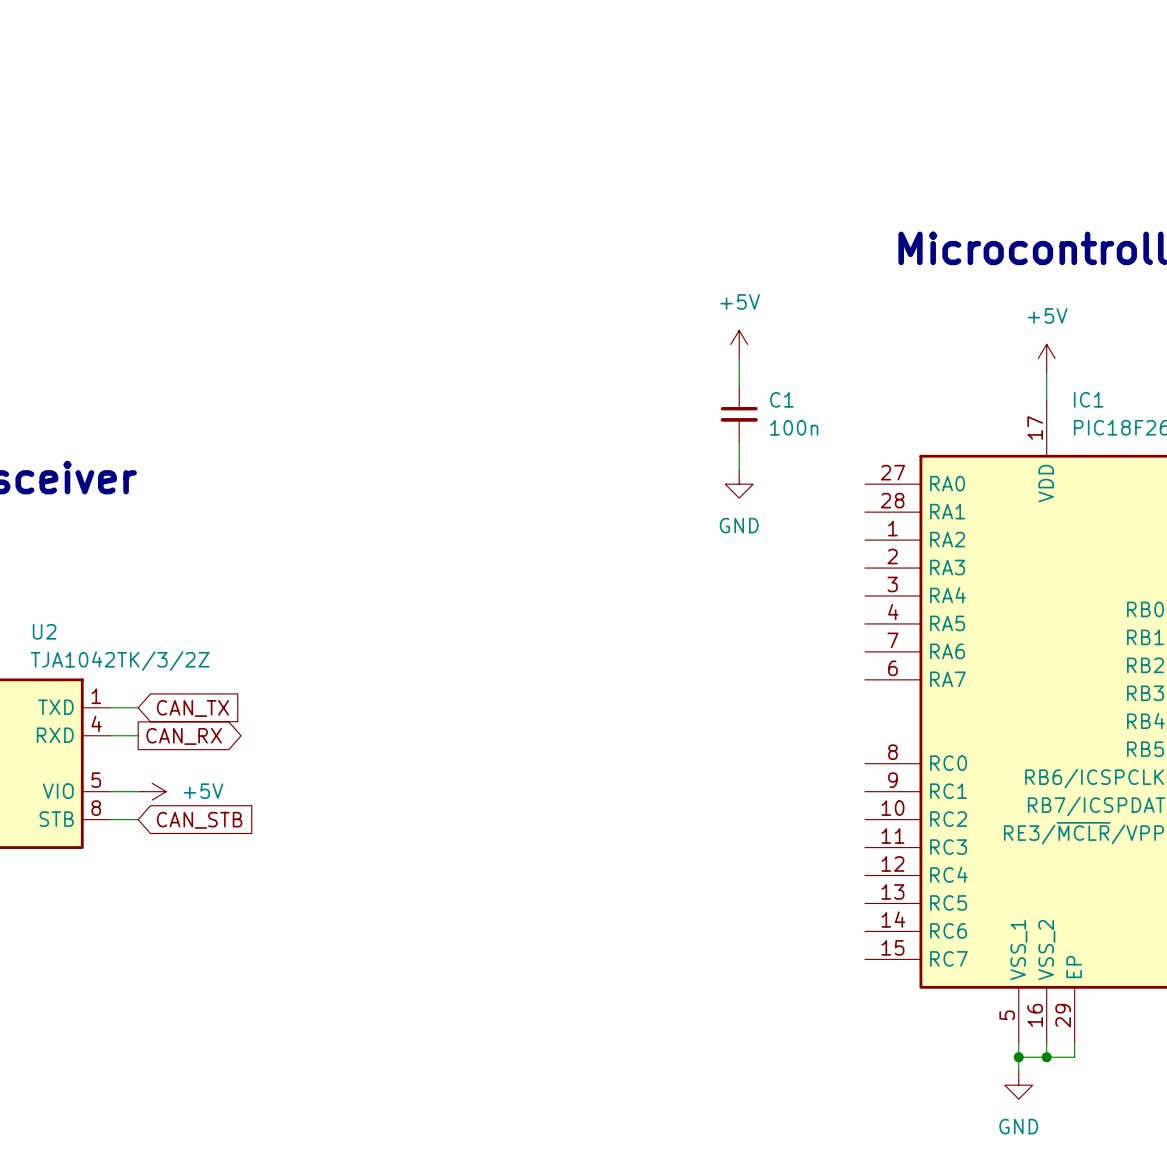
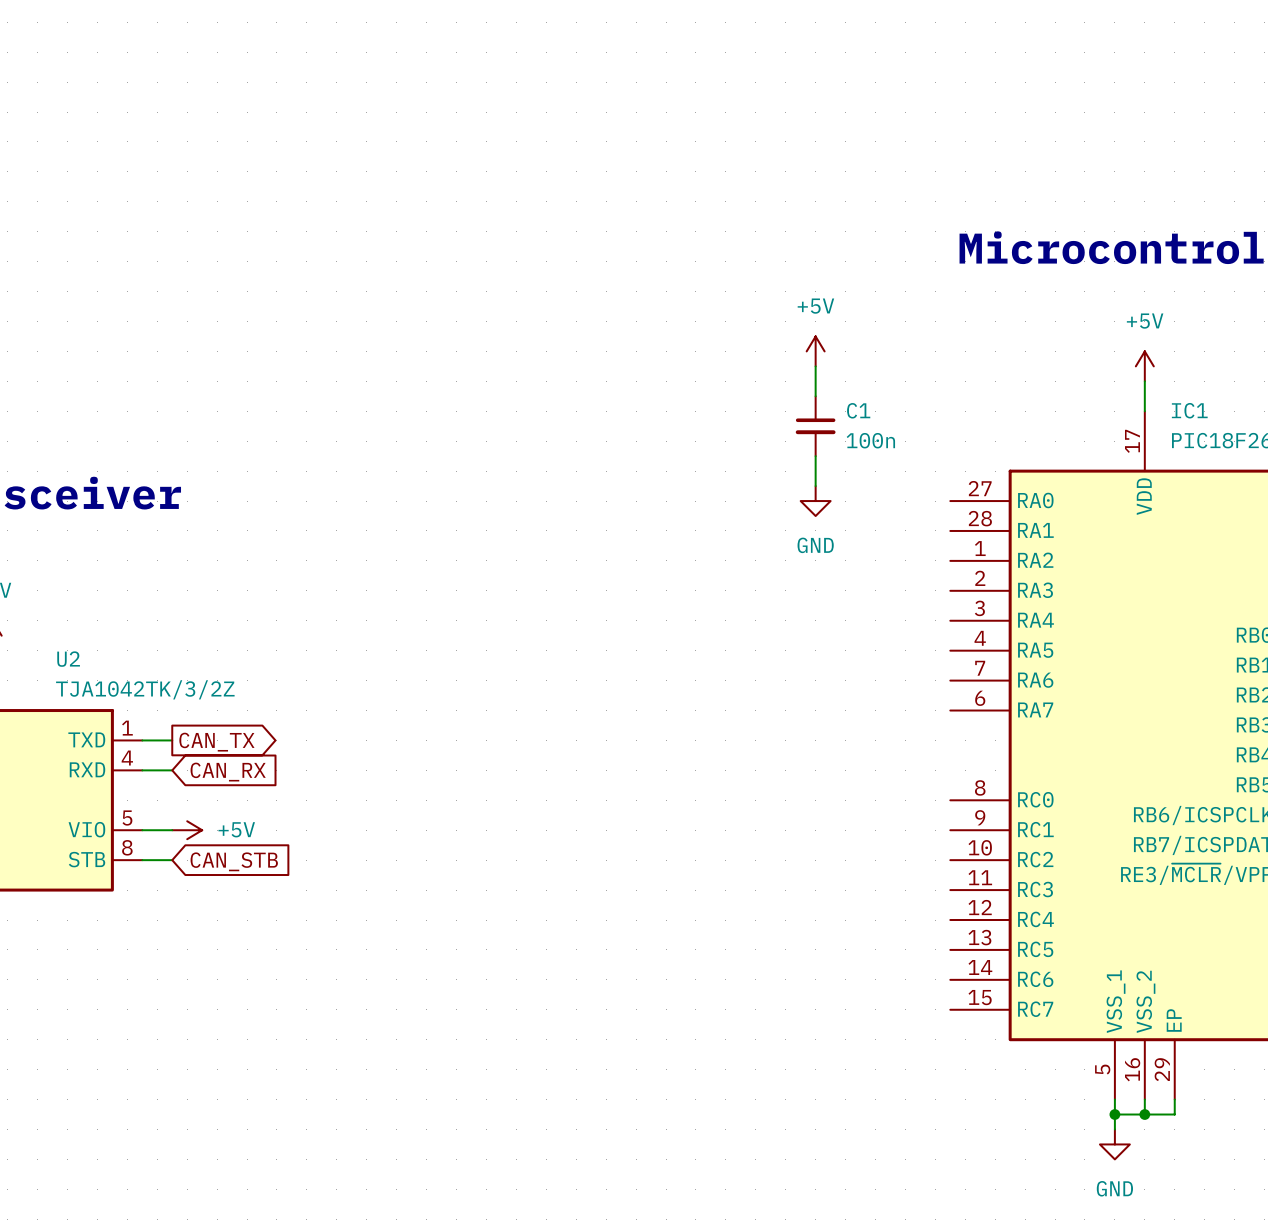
global label shape: input (192, 708) -> output (216, 742)
global label shape: output (184, 736) -> input (228, 772)

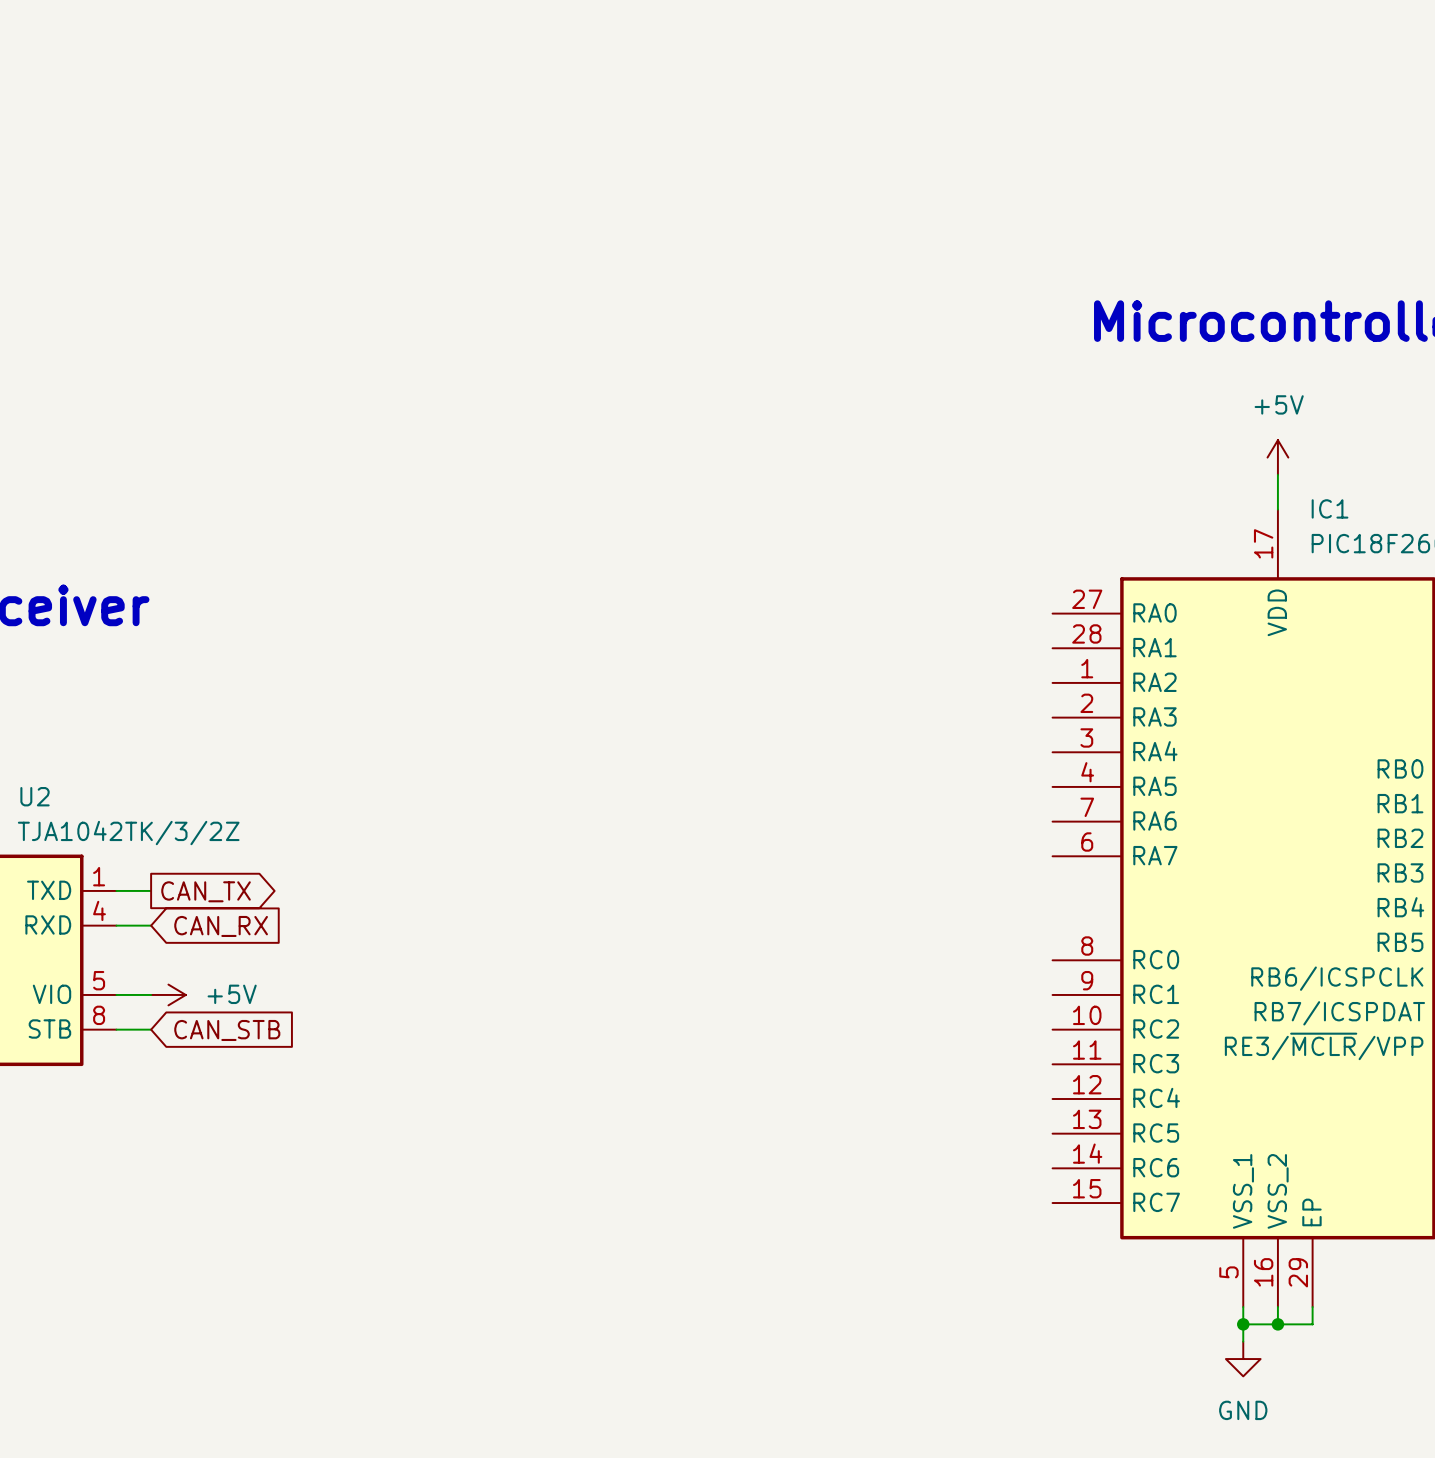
power symbol: +5V (815, 351) -> none
wire: (815, 366) (815, 396) -> none
C1: 100n (815, 426) -> none
wire: (815, 456) (815, 486) -> none
power symbol: GND (815, 501) -> none

